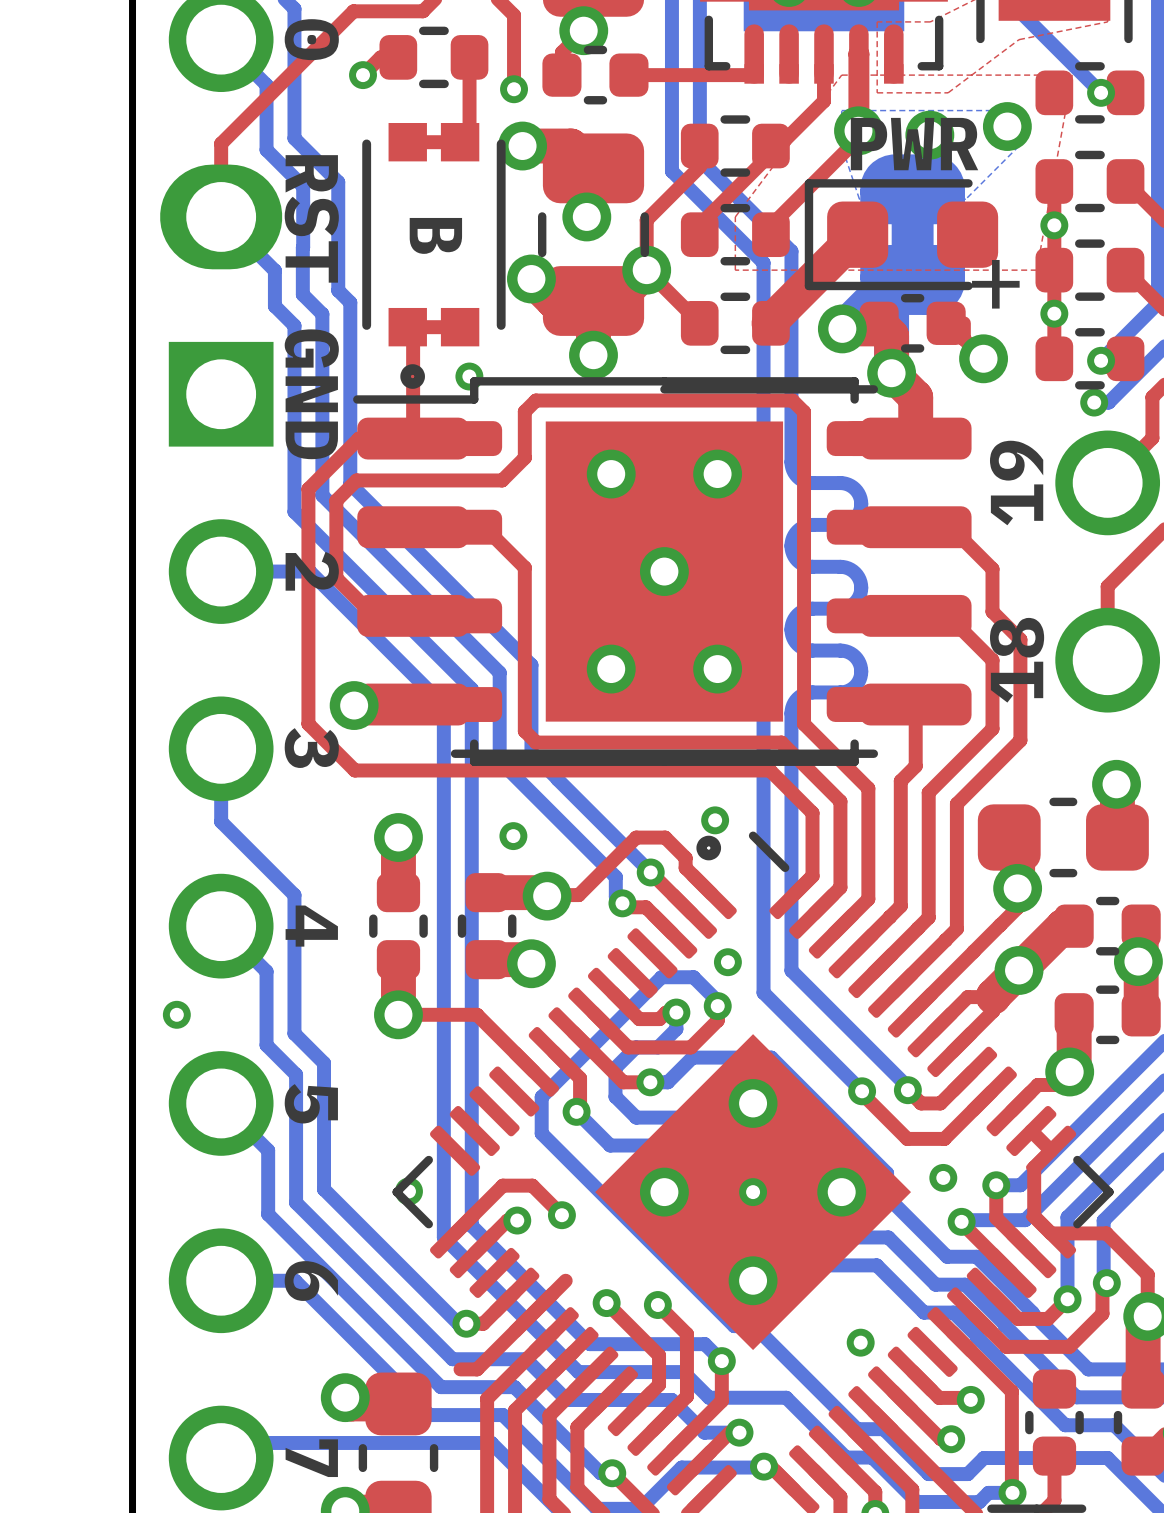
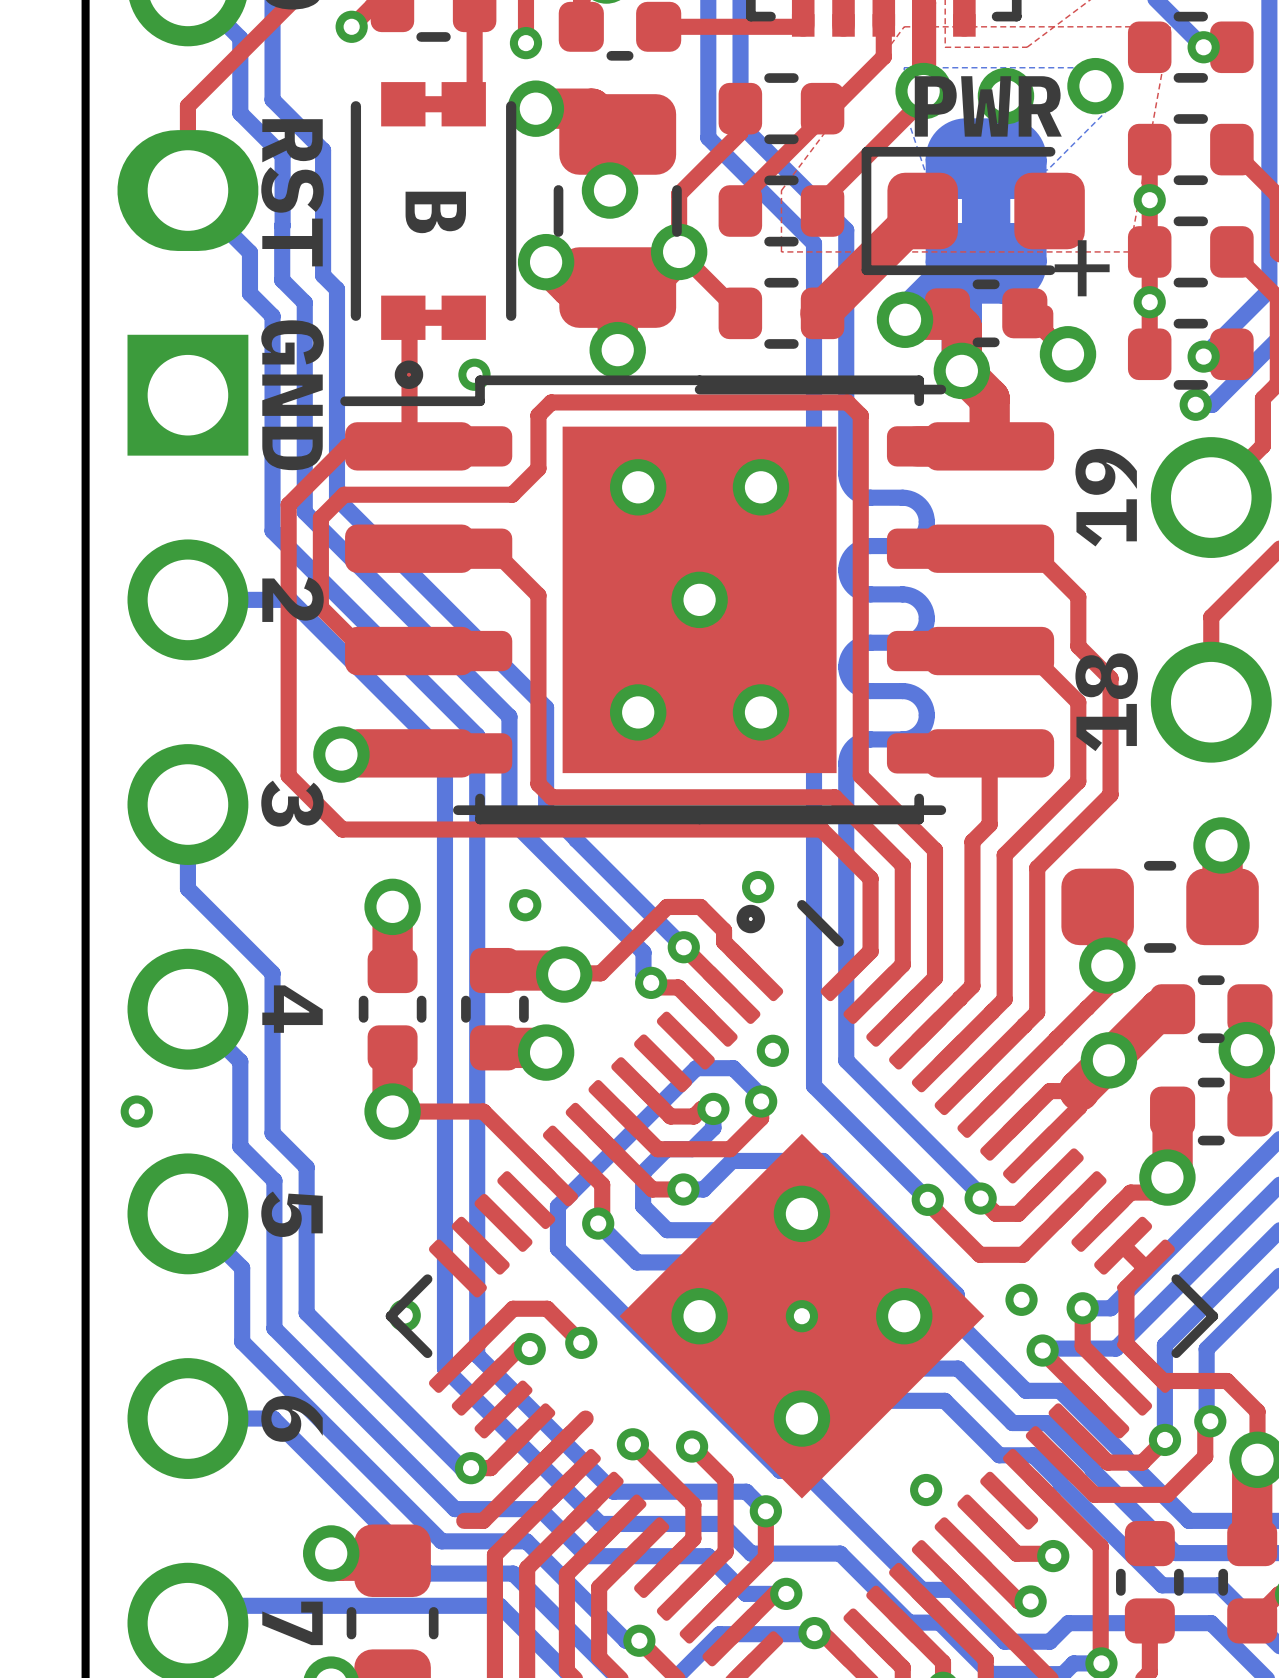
top track: (1051, 1233) (1106, 1233) (1121, 1248) -> (1145, 1363) (1162, 1380) (1226, 1380)

